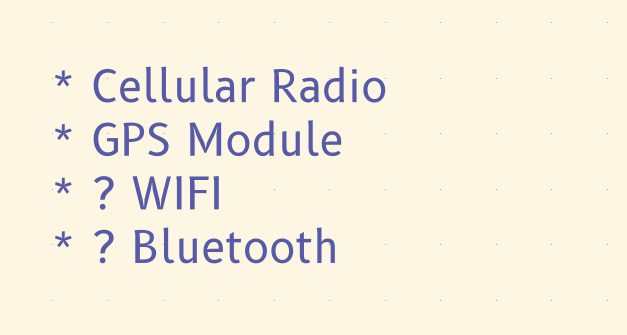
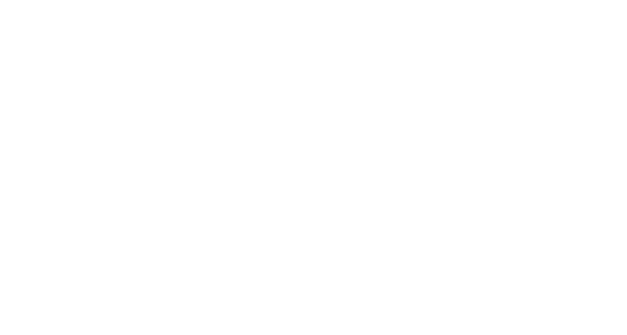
text: * Cellular Radio (220, 84) -> none
text: * GPS Module (198, 138) -> none
text: * ? WIFI (136, 192) -> none
text: * ? Bluetooth (194, 245) -> none

